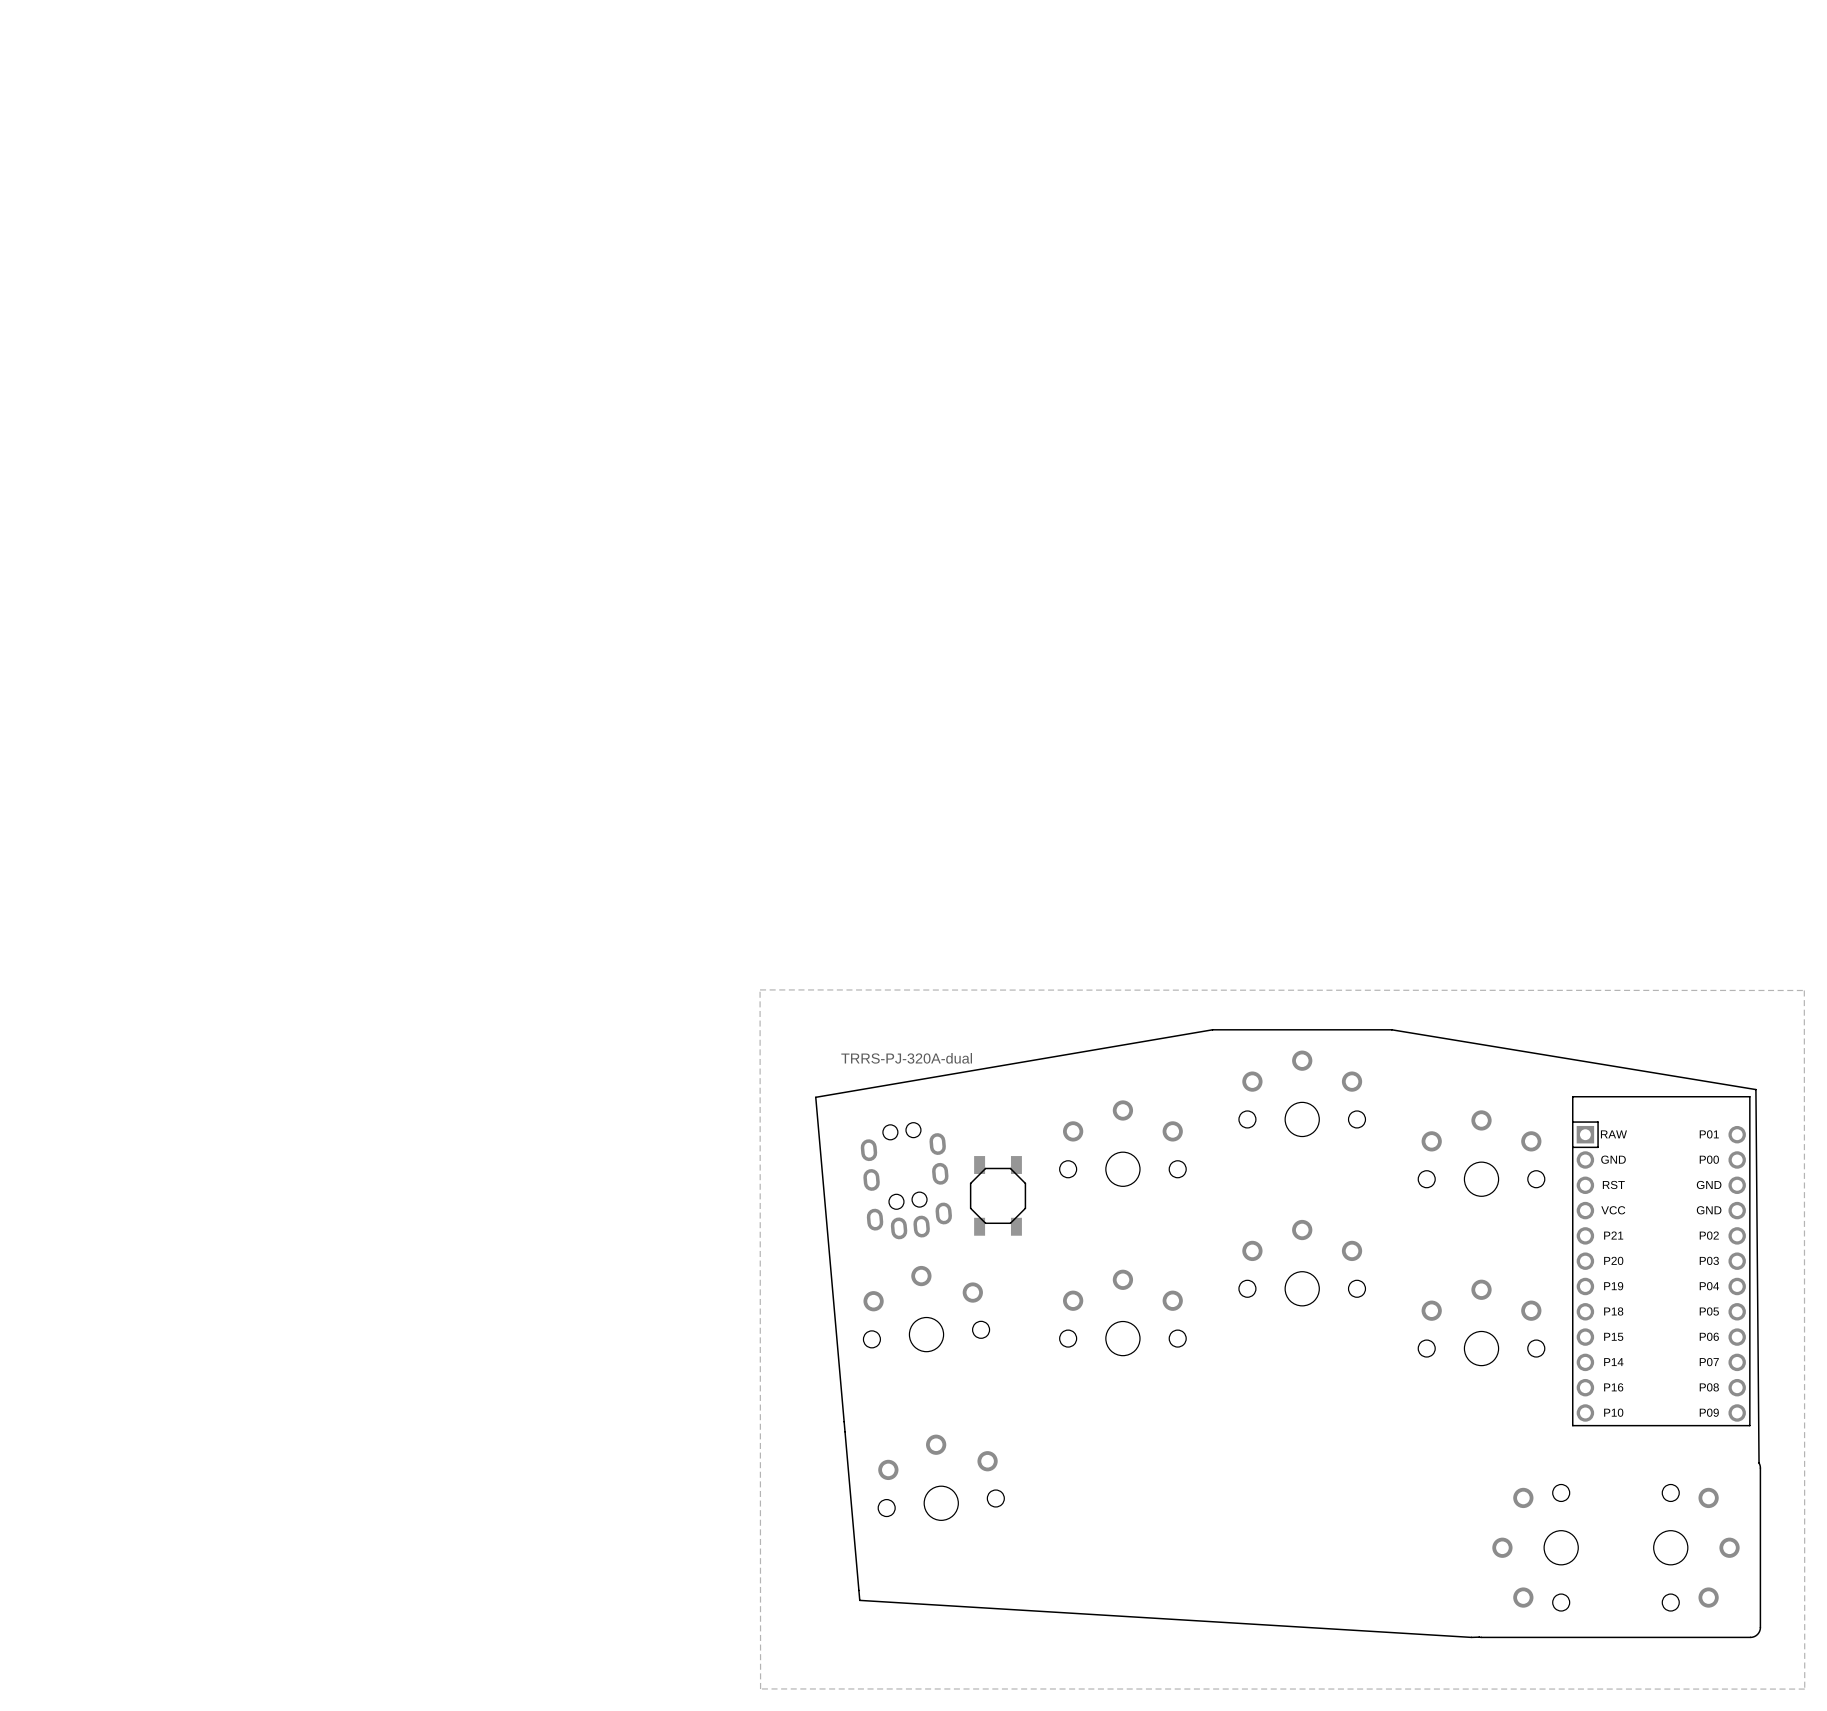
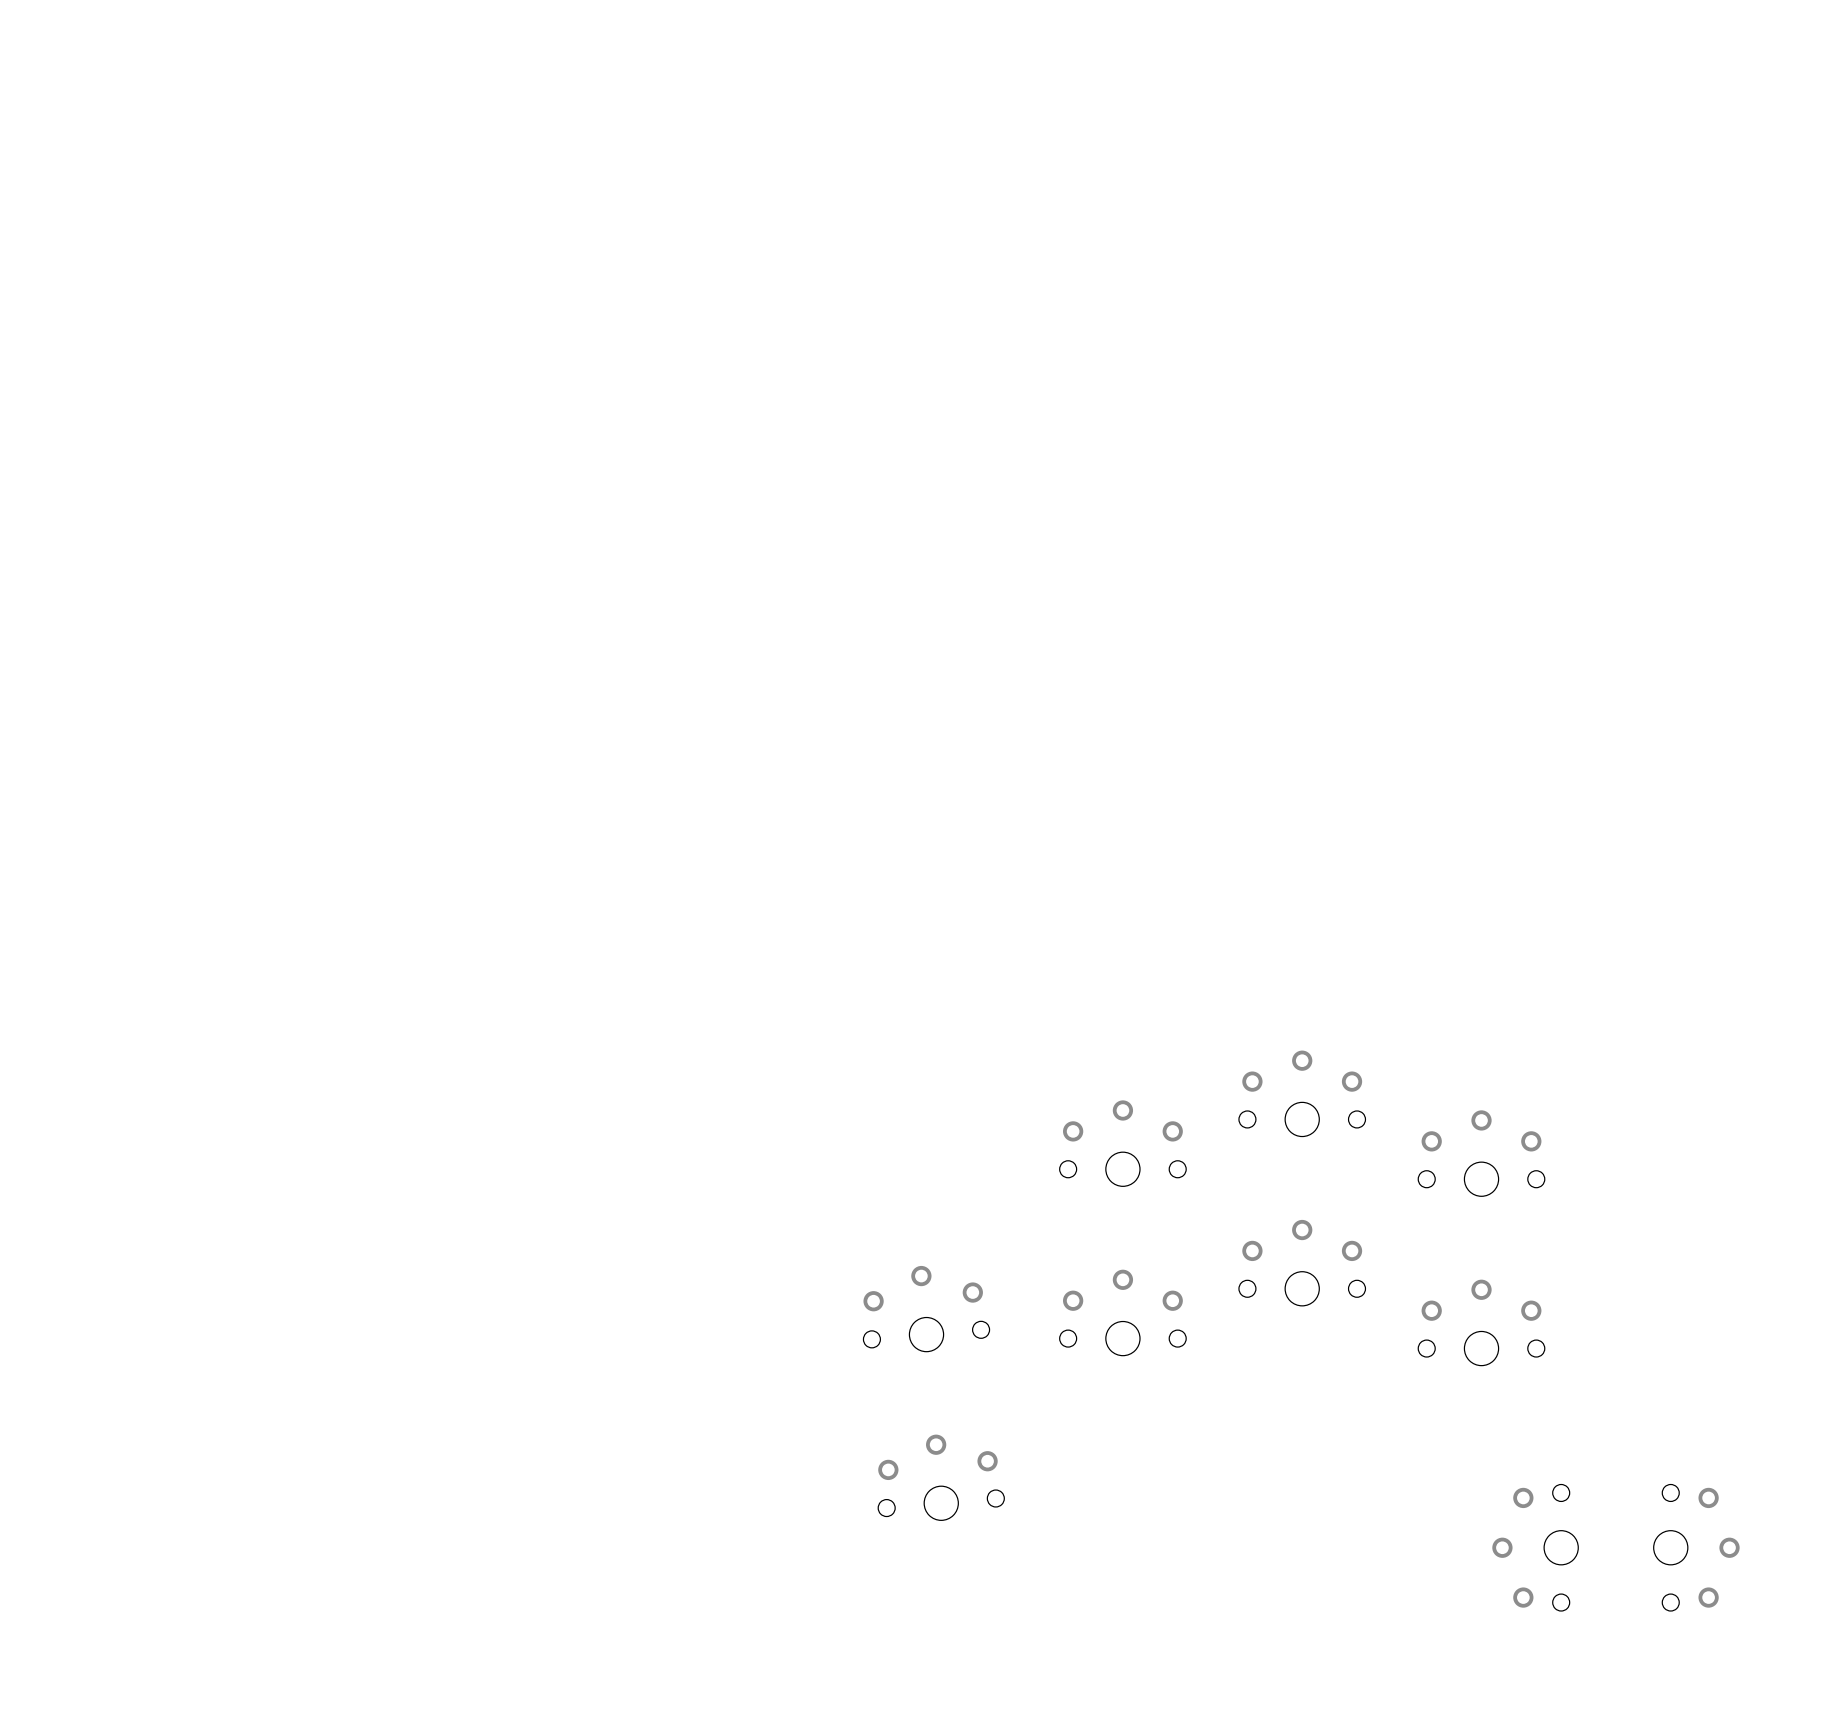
zone outline: (760, 989) (760, 1688) (1804, 1689) (1804, 990) (760, 989) -> none
board edge: (1212, 1029) (815, 1097) (859, 1600) (1471, 1637) (1750, 1637) (1757, 1634) (1760, 1627) (1760, 1468) (1755, 1089) (1391, 1029) (1212, 1029) -> none
part: TRRS-PJ-320A-dual (906, 1181) -> none
part: (998, 1195) -> none
part: (1661, 1261) -> none

